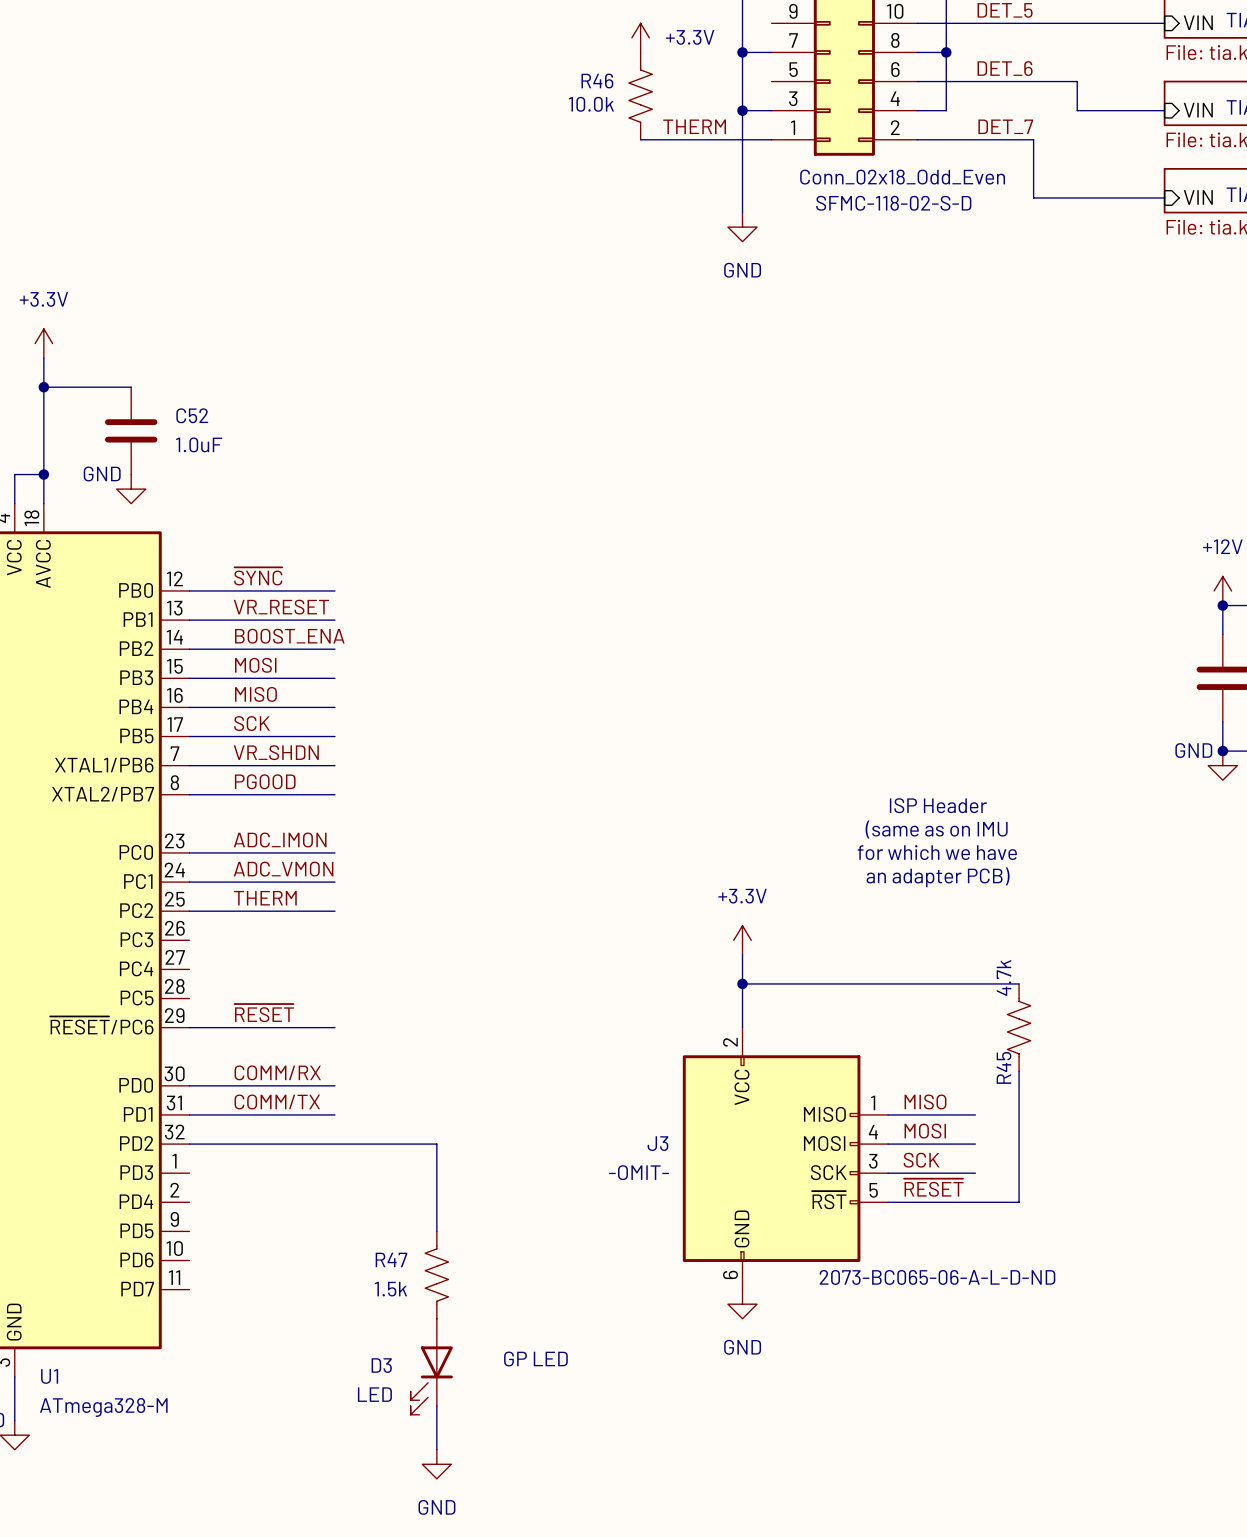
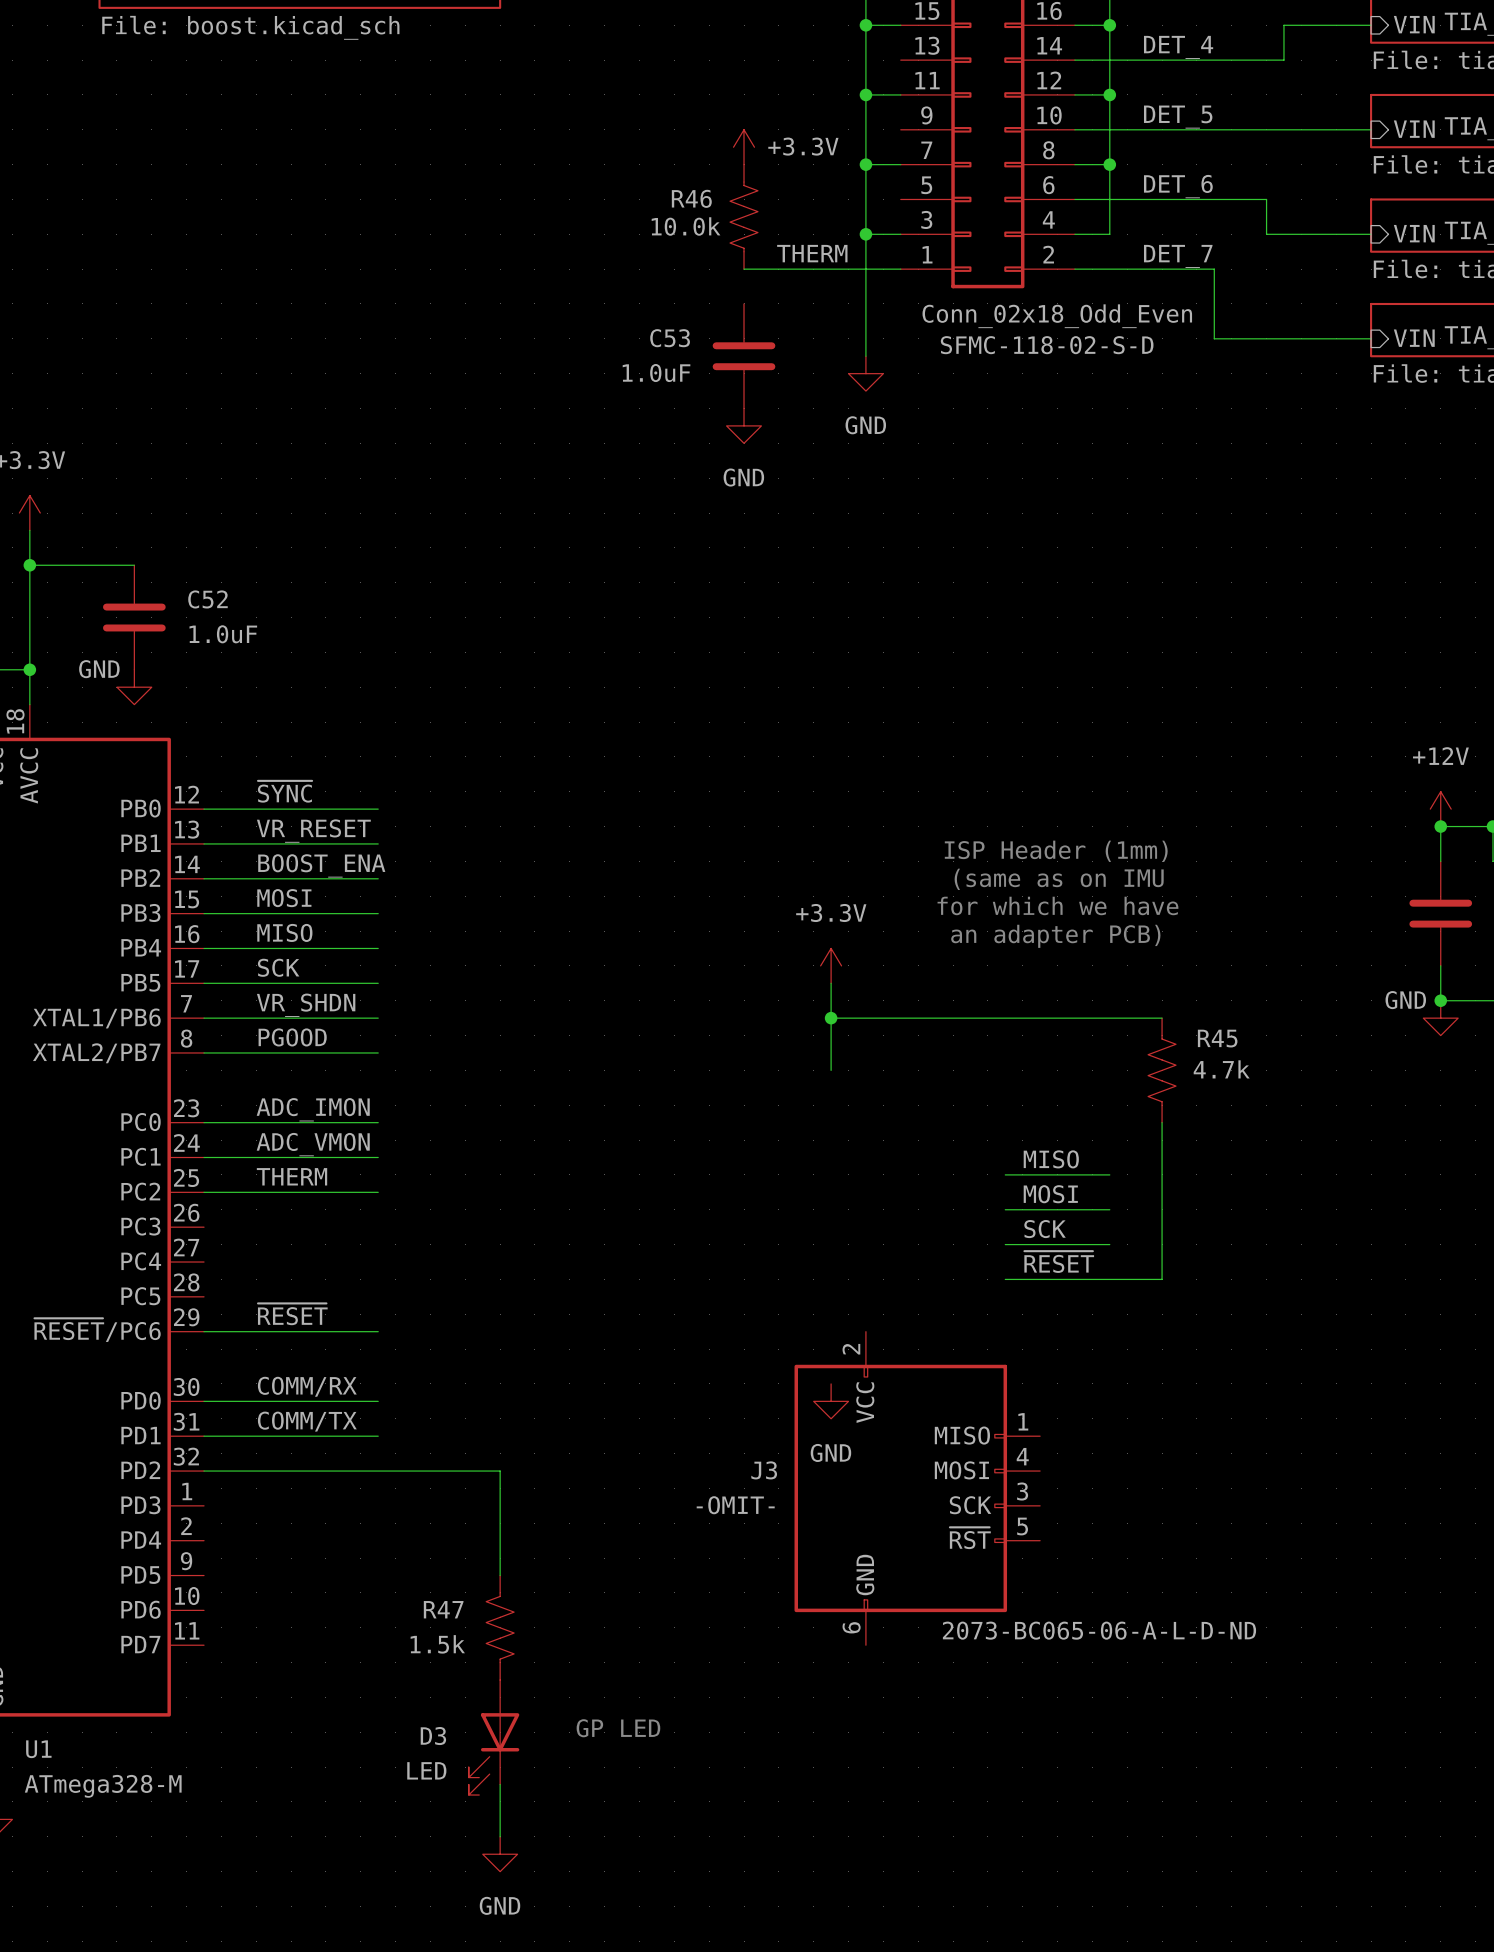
C53: none -> 1.0uF (744, 356)
power symbol: none -> GND (744, 425)
text: none -> ISP Header (1mm) (1056, 851)
wire: none -> (831, 1018) (1162, 1018)
junction: none -> (831, 1018)
text: ISP Header (938, 805) -> none
text position: (same as on IMU (936, 829) -> (same as on IMU (1059, 879)
text position: for which we have (937, 852) -> for which we have (1057, 905)
text position: an adapter PCB) (938, 877) -> an adapter PCB) (1055, 936)
power symbol position: +3.3V (742, 940) -> +3.3V (831, 965)
wire: (742, 954) (742, 1027) -> (831, 983) (831, 1070)
R45 value rotation: 0° (1003, 977) -> 90° clockwise (1221, 1069)
R45 value position: 4.7k (1003, 977) -> 4.7k (1221, 1069)
wire: (742, 983) (858, 983) -> none
junction: (742, 983) -> none
wire: (989, 983) (1019, 983) -> (1162, 1279) (1162, 1122)
R45 position: (1019, 1027) -> (1162, 1070)
R45 name rotation: 0° (1004, 1067) -> 90° clockwise (1217, 1038)
R45 name position: R45 (1004, 1067) -> R45 (1217, 1038)
wire: (1019, 1071) (1019, 1202) (888, 1202) -> none
label position: MISO (925, 1101) -> MISO (1051, 1159)
wire: (888, 1114) (975, 1114) -> (1005, 1174) (1109, 1174)
label position: MOSI (925, 1131) -> MOSI (1050, 1194)
wire: (888, 1144) (975, 1144) -> (1005, 1209) (1109, 1209)
label position: SCK (921, 1160) -> SCK (1045, 1229)
wire: (888, 1173) (975, 1173) -> (1005, 1244) (1109, 1244)
label position: ~{RESET} (933, 1187) -> ~{RESET} (1059, 1262)
power symbol position: GND (742, 1304) -> GND (831, 1401)

